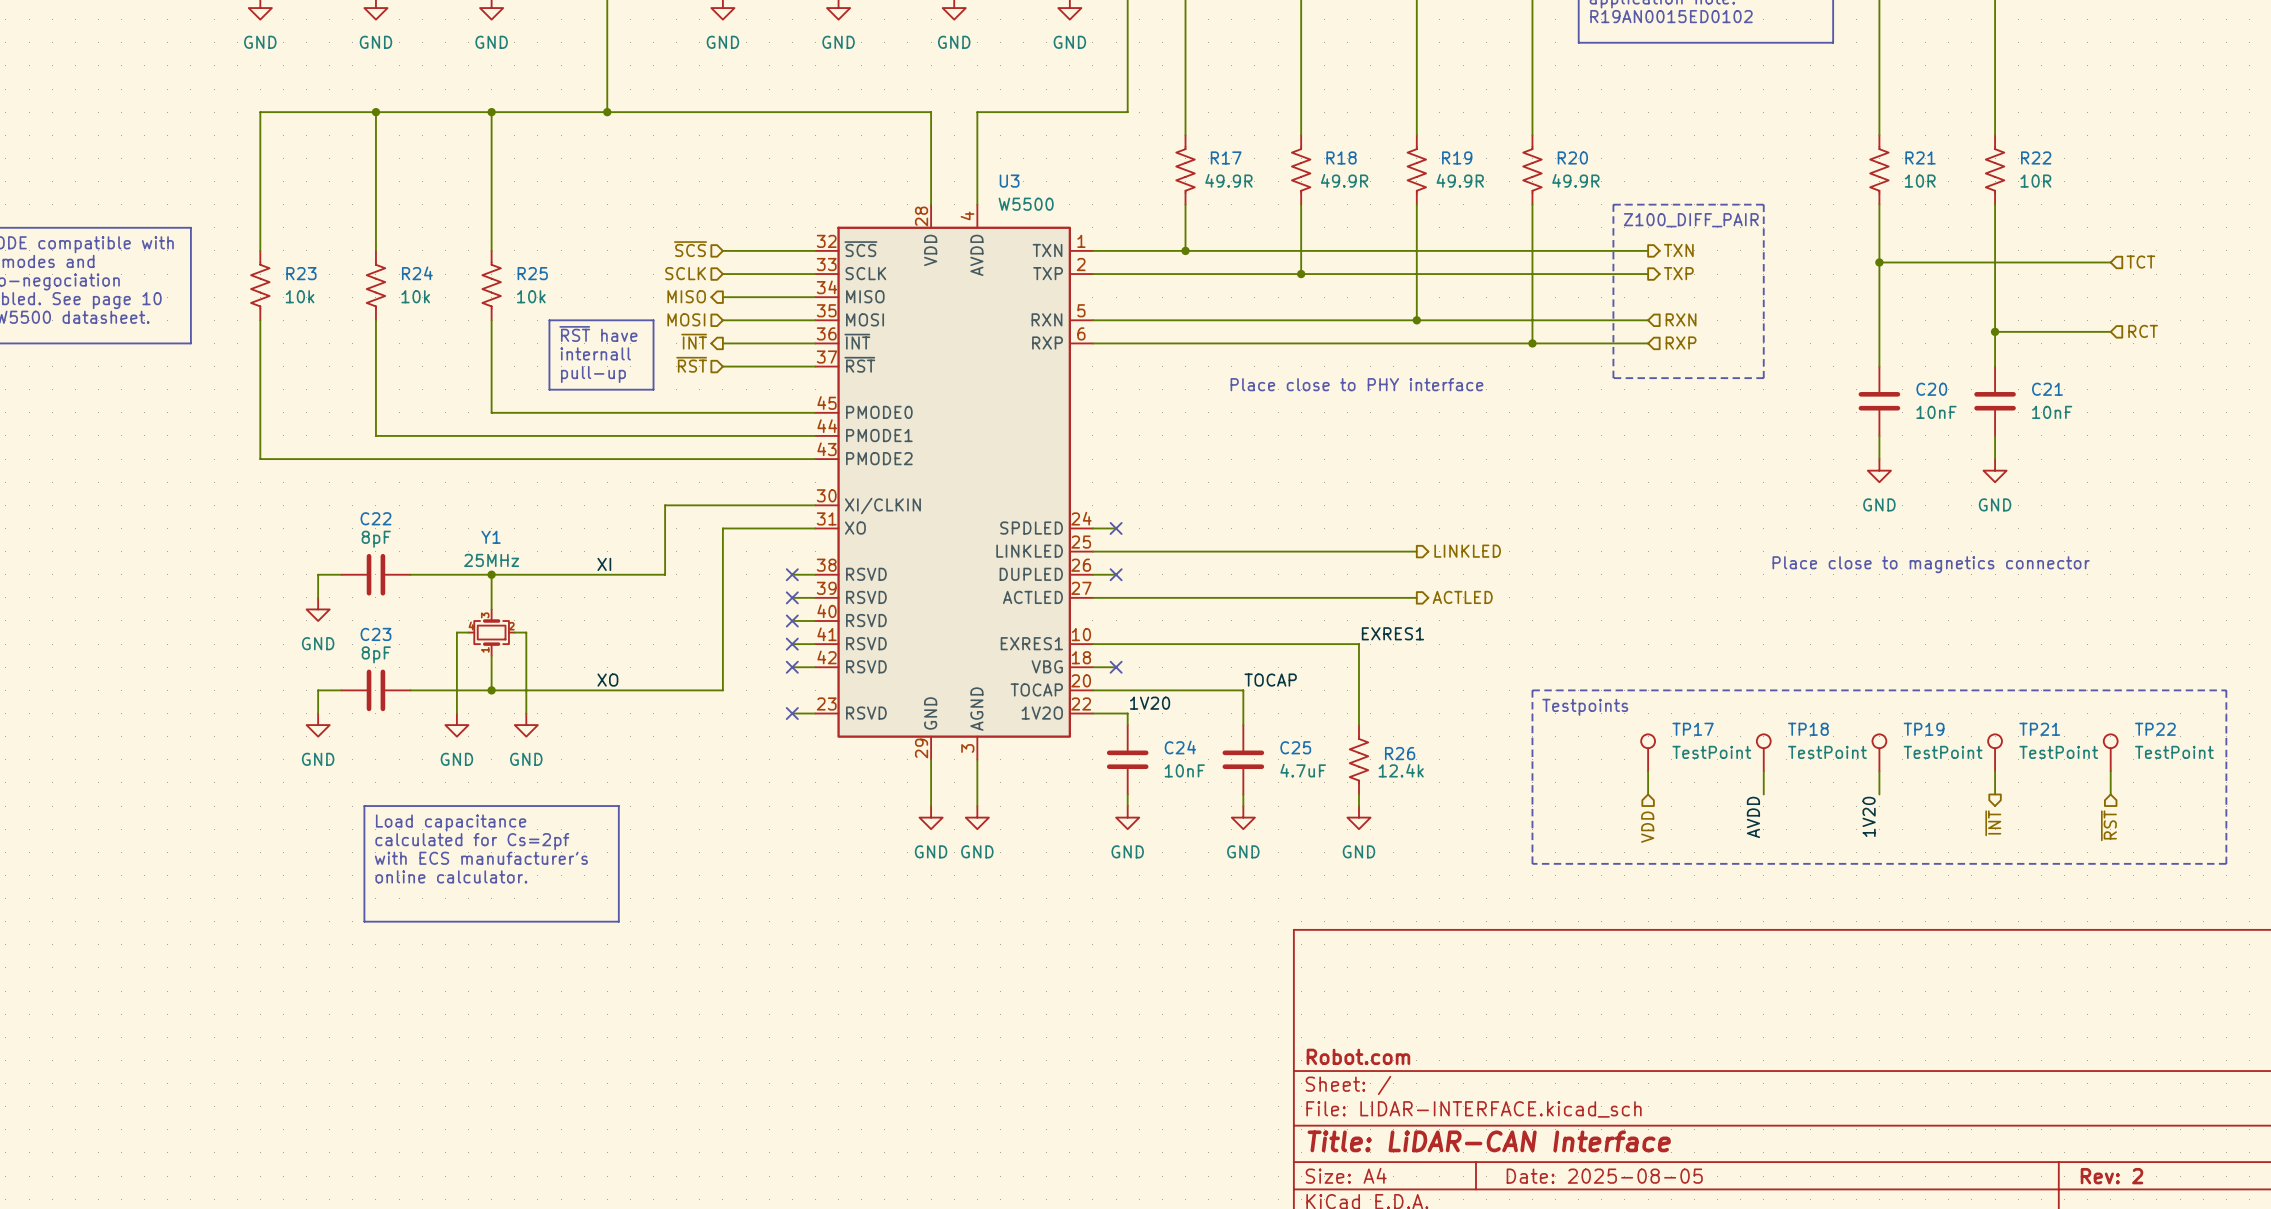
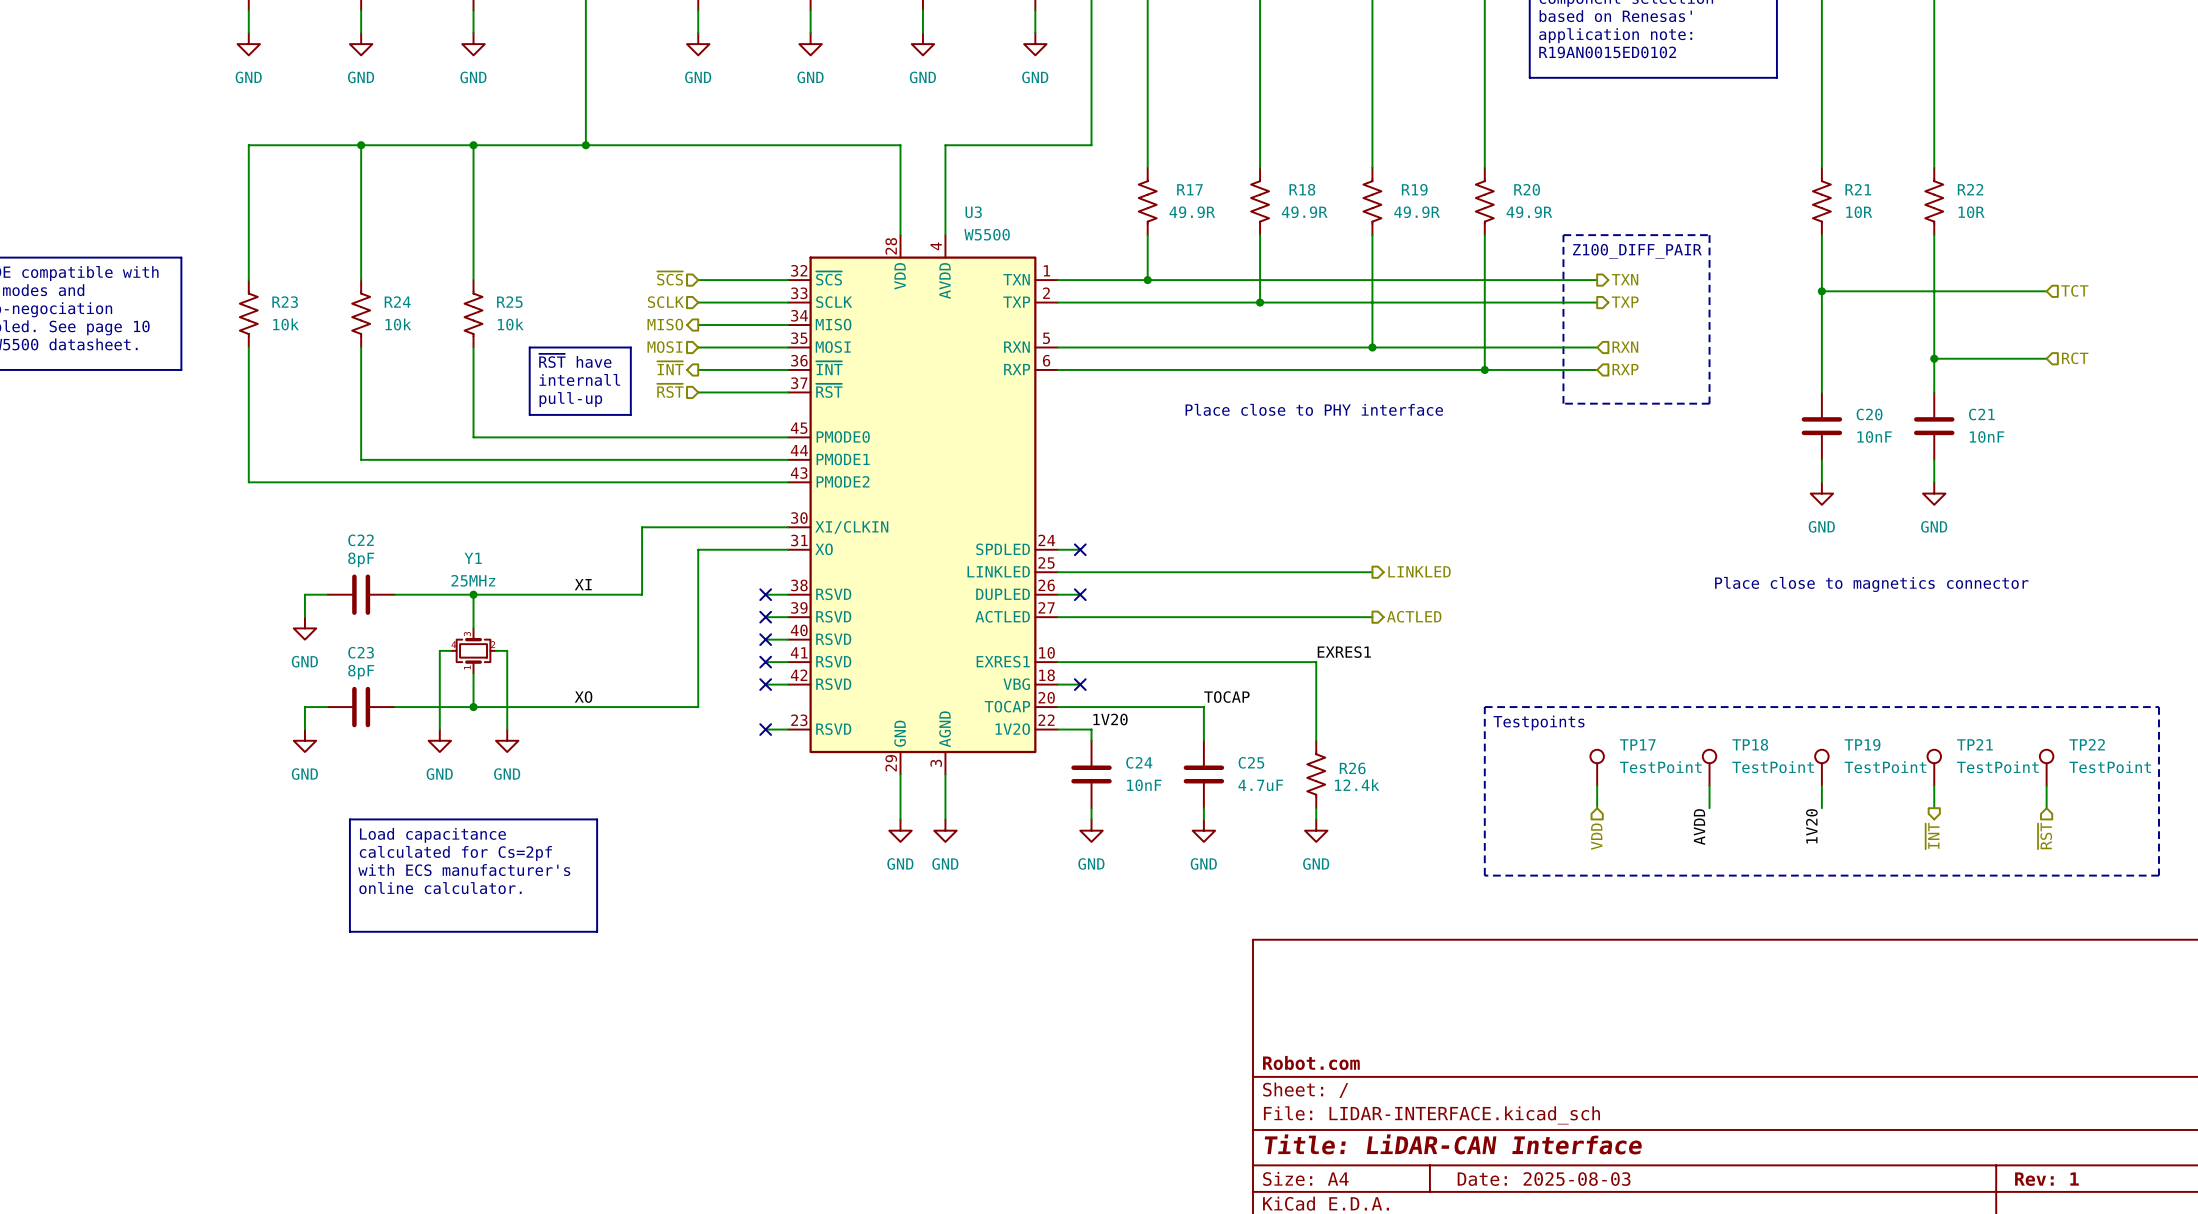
title block: Date: 2025-08-05 (1604, 1176) -> Date: 2025-08-03 (1544, 1179)
title block: Rev: 2 (2111, 1176) -> Rev: 1 (2046, 1179)

